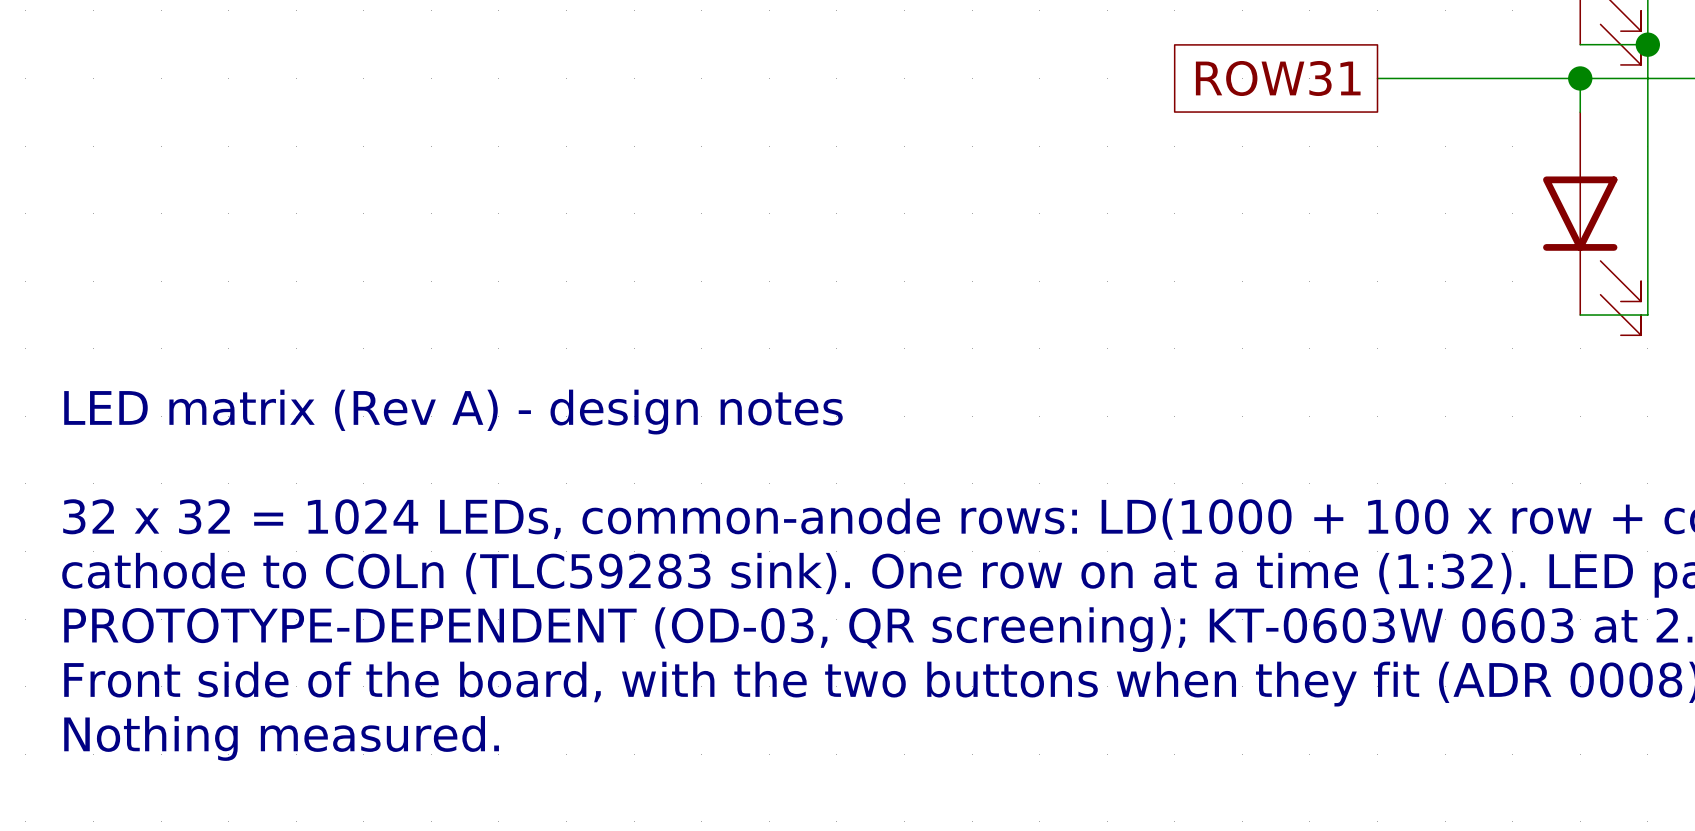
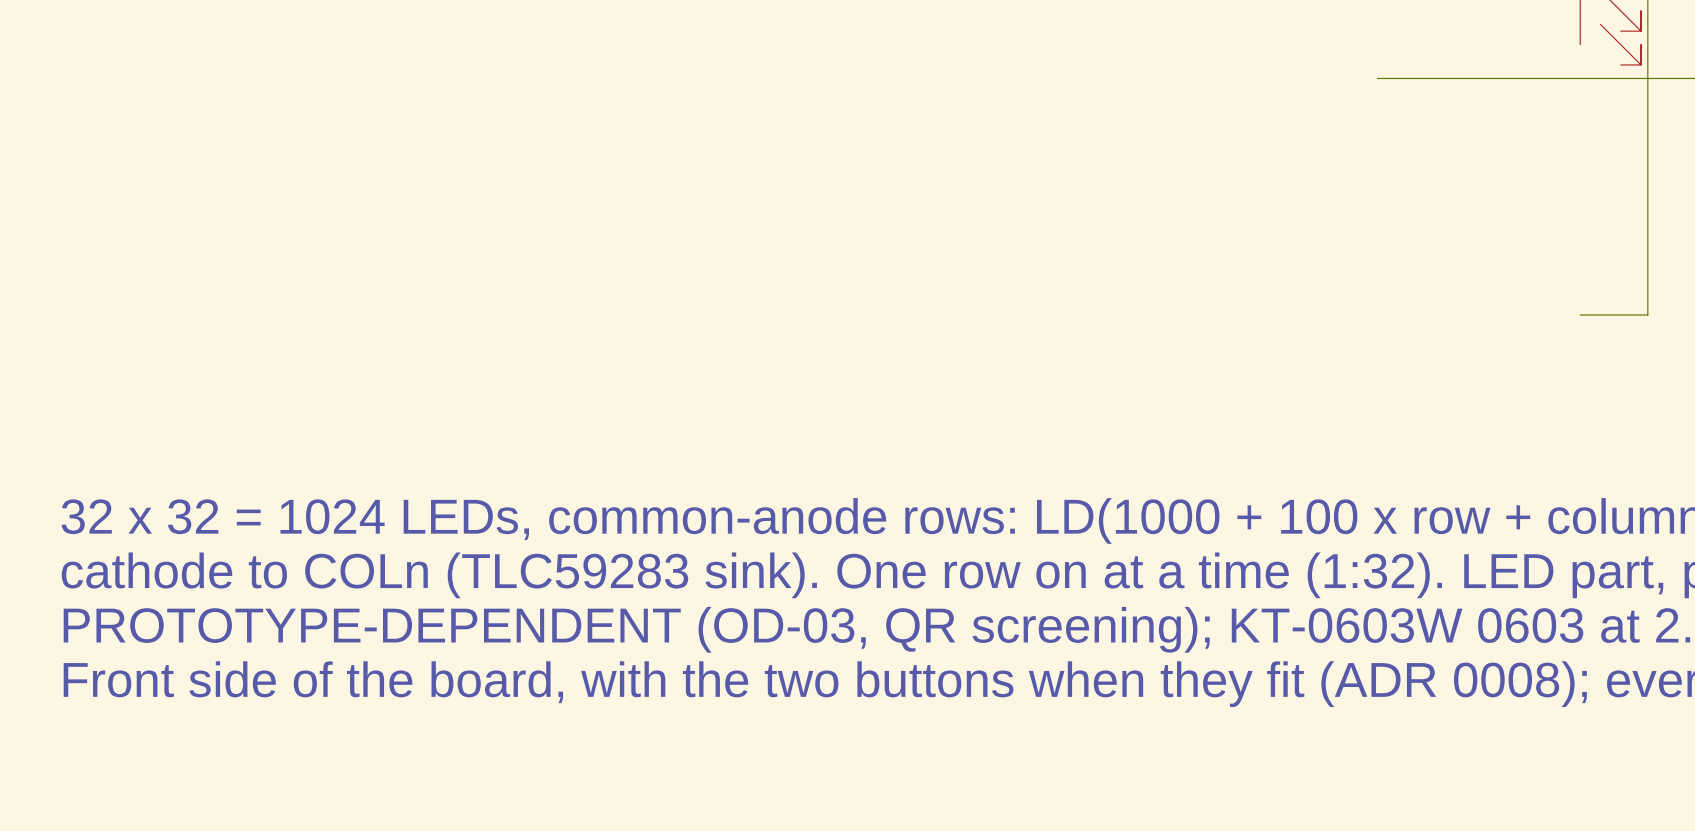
wire: (1580, 44) (1647, 44) -> none
junction: (1647, 44) -> none
global label: ROW31 (1278, 78) -> none
wire: (1580, 78) (1580, 112) -> none
junction: (1580, 78) -> none
part: (1592, 223) -> none
text: LED matrix (Rev A) - design notes (453, 412) -> none
text: Nothing measured. (281, 738) -> none

